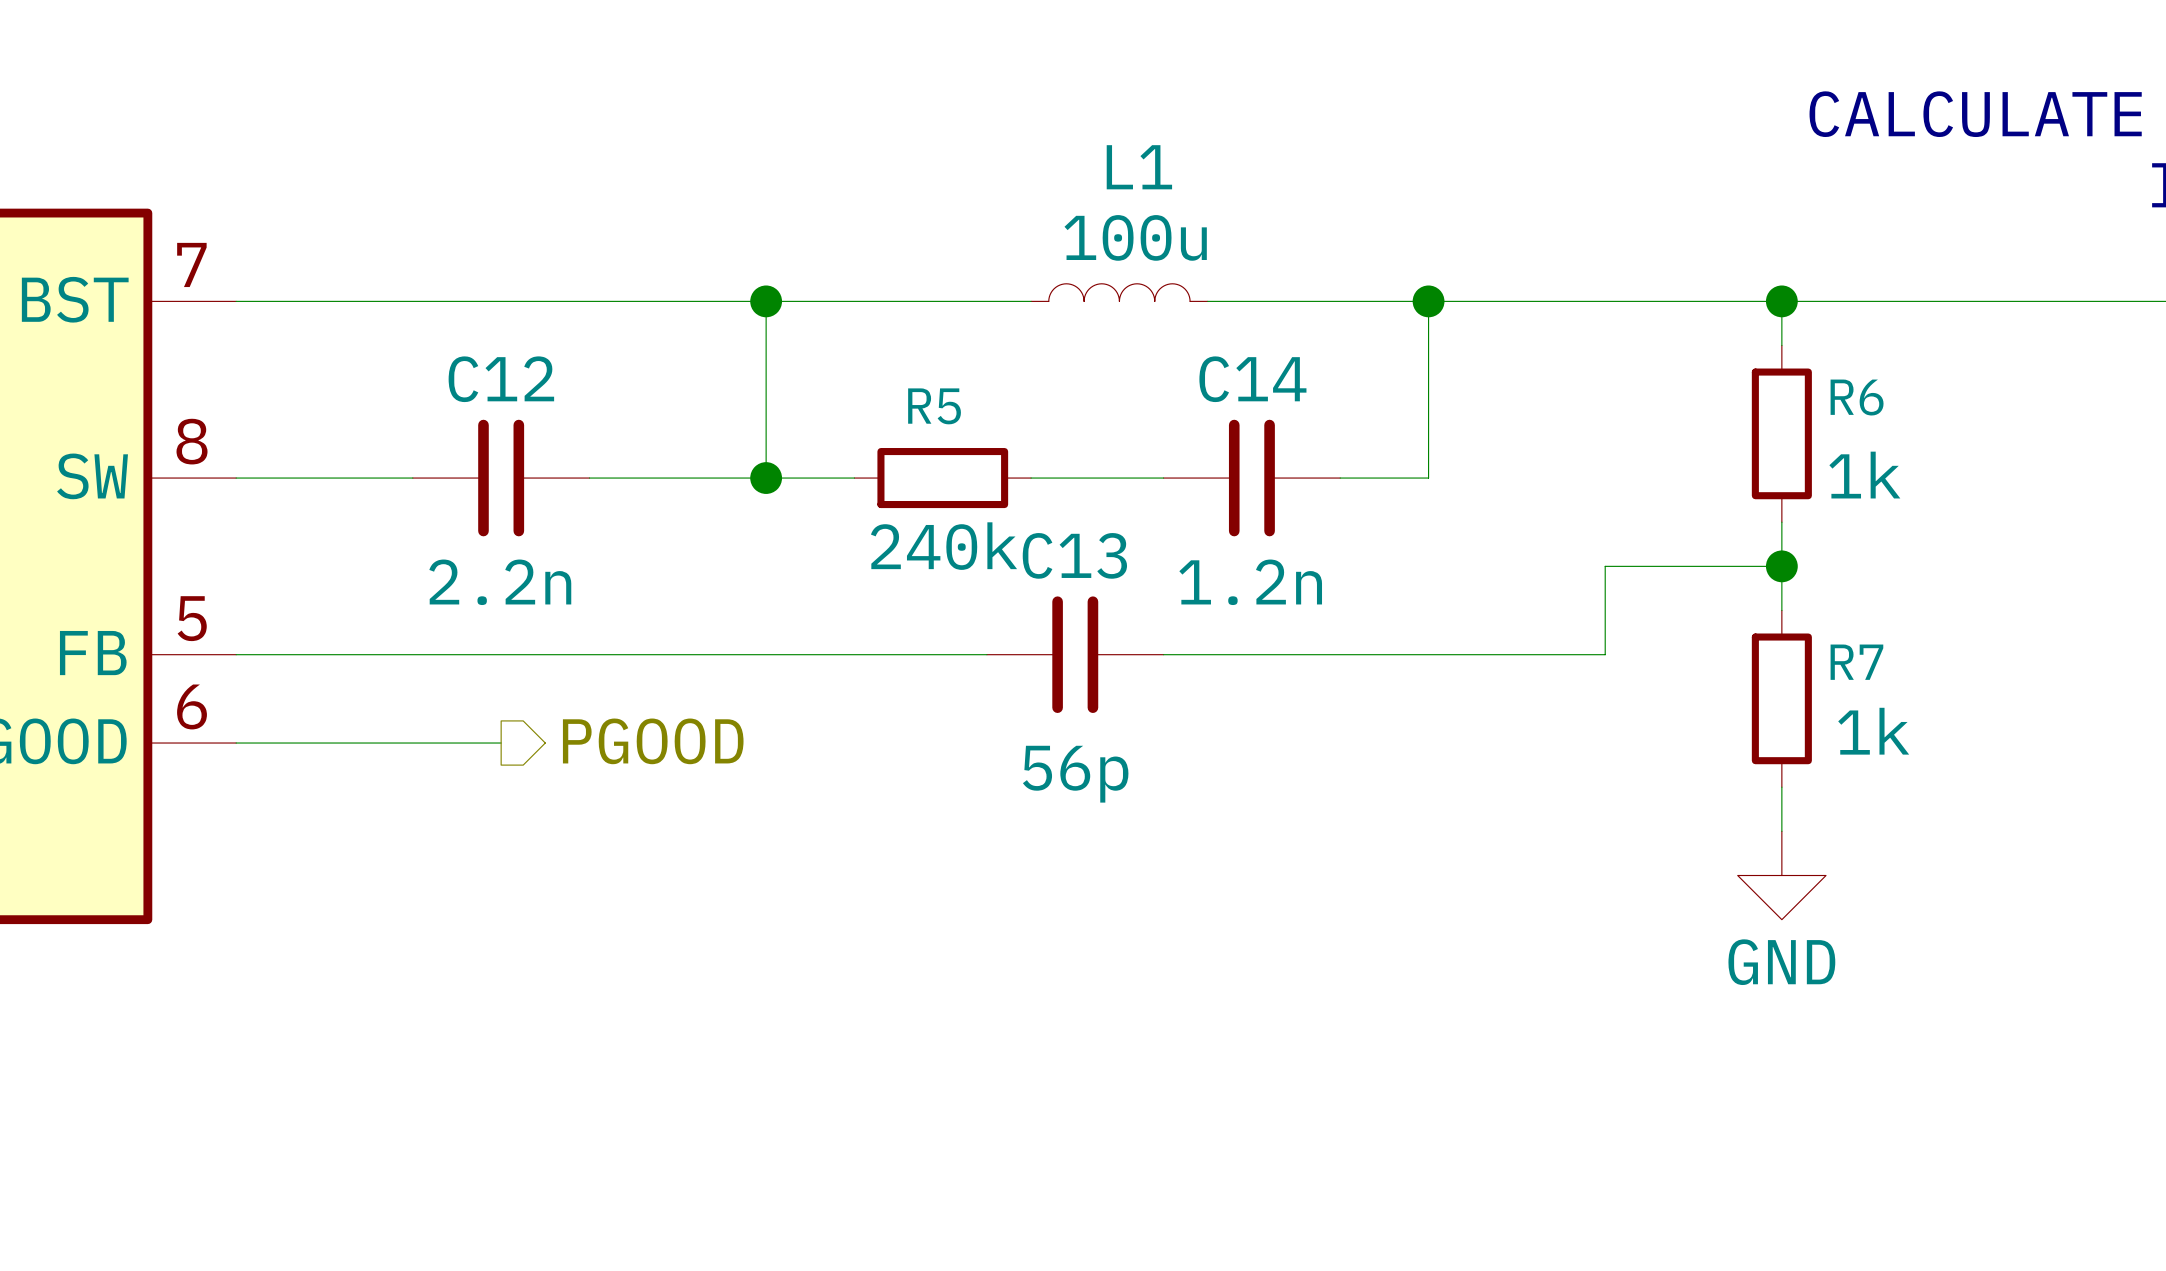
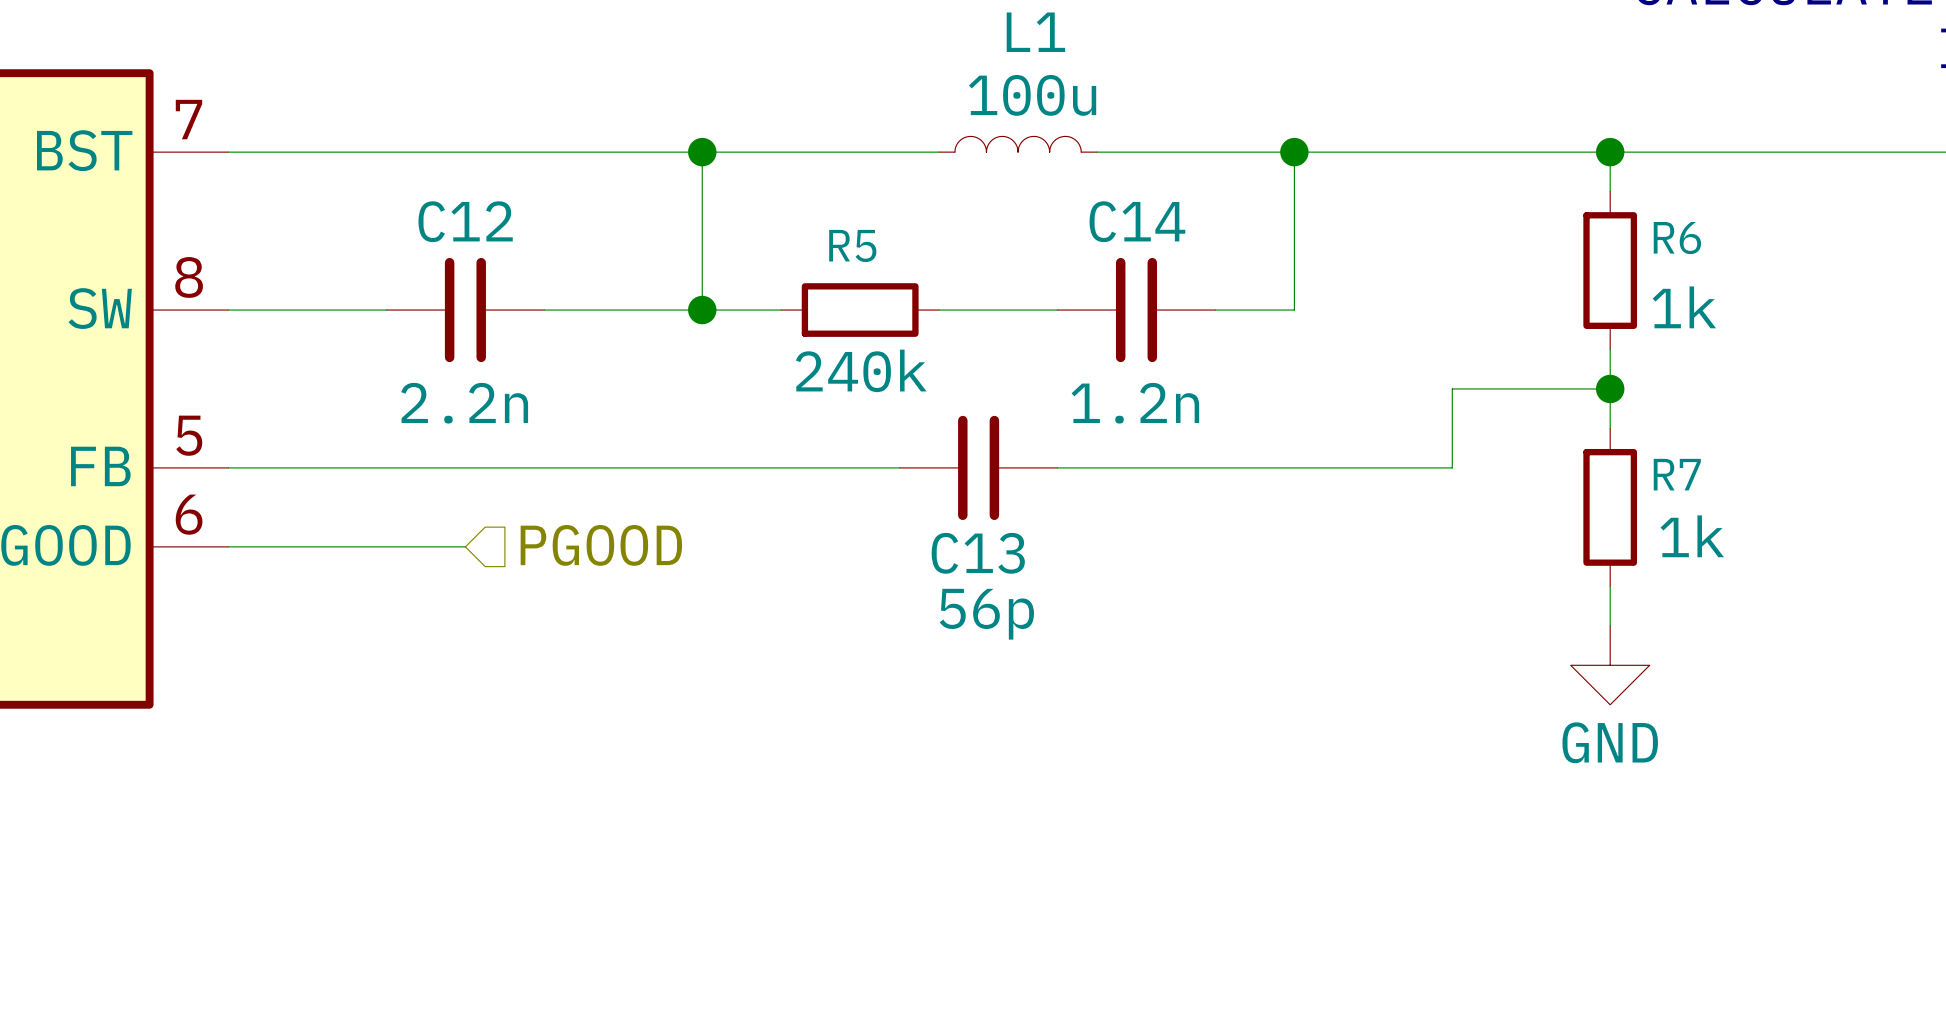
C13 name position: C13 (1074, 555) -> C13 (978, 553)
hierarchical label shape: output (653, 741) -> input (601, 545)
C13 value position: 56p (1075, 774) -> 56p (986, 614)

